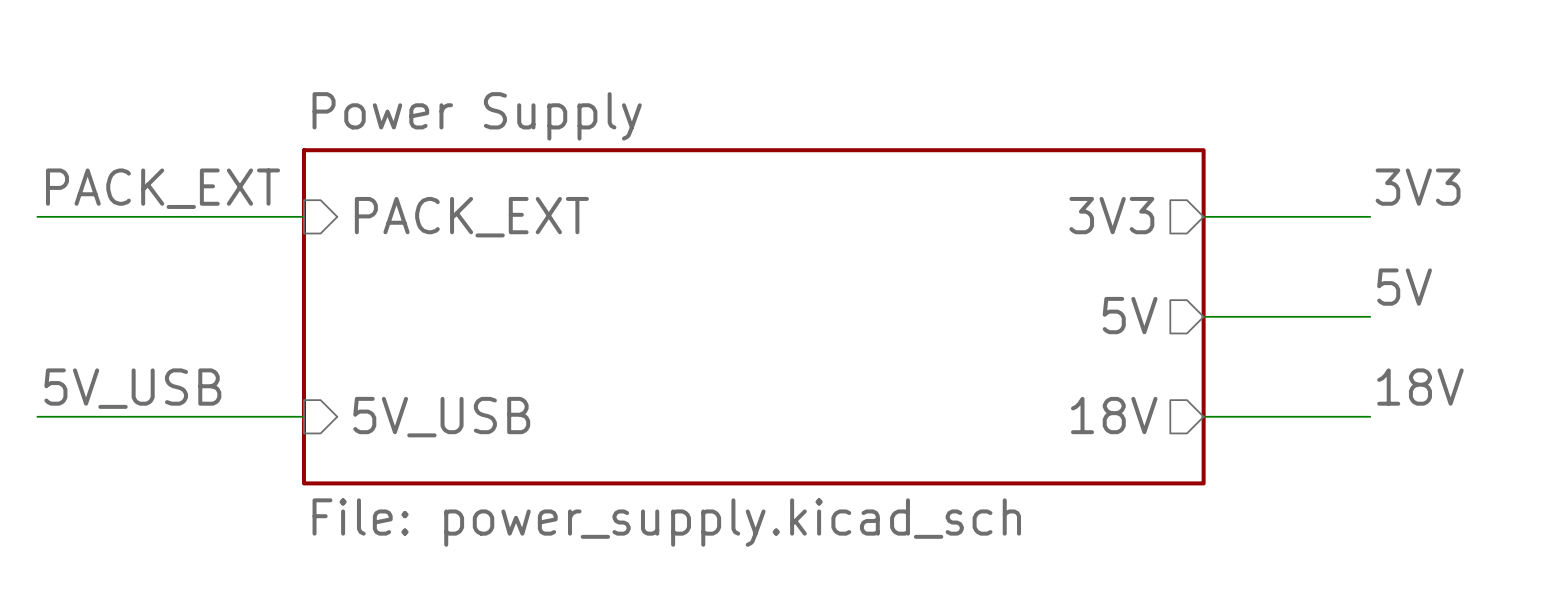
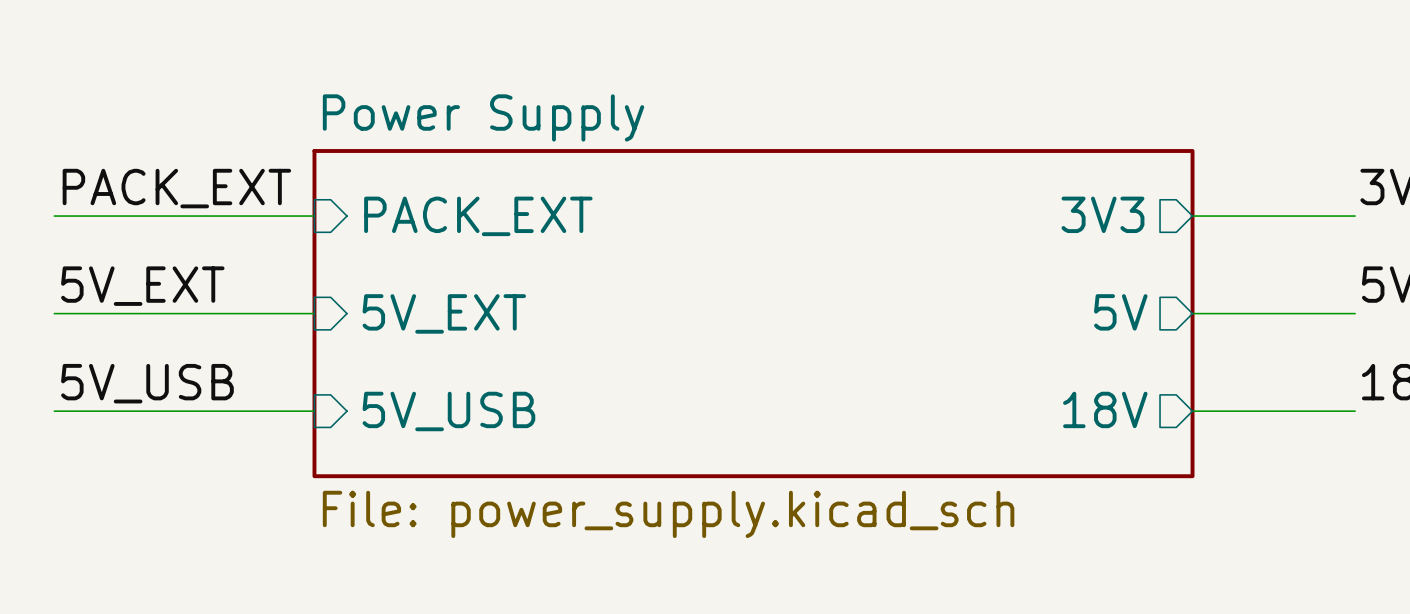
label: none -> 5V_EXT (142, 286)
wire: none -> (54, 313) (314, 313)
sheet pin: none -> 5V_EXT (444, 313)

